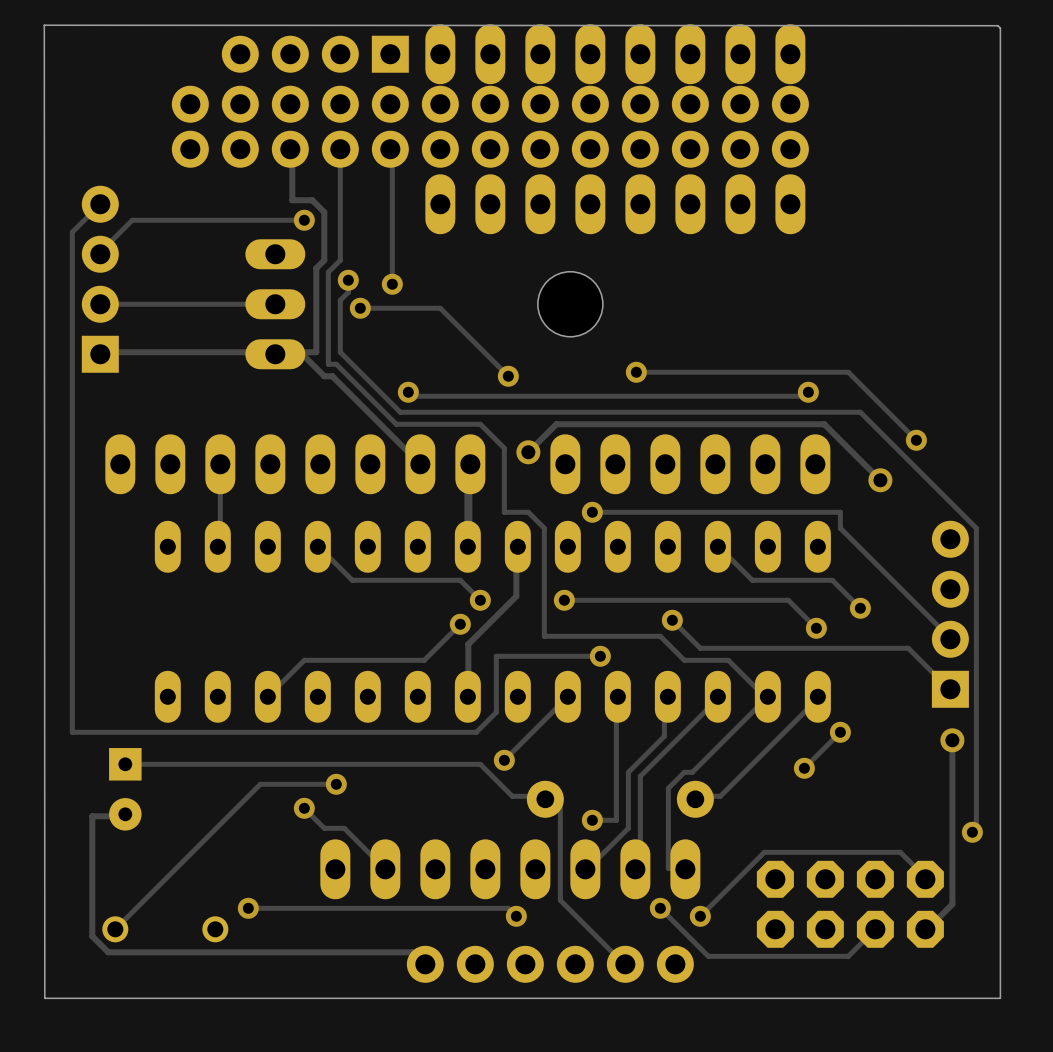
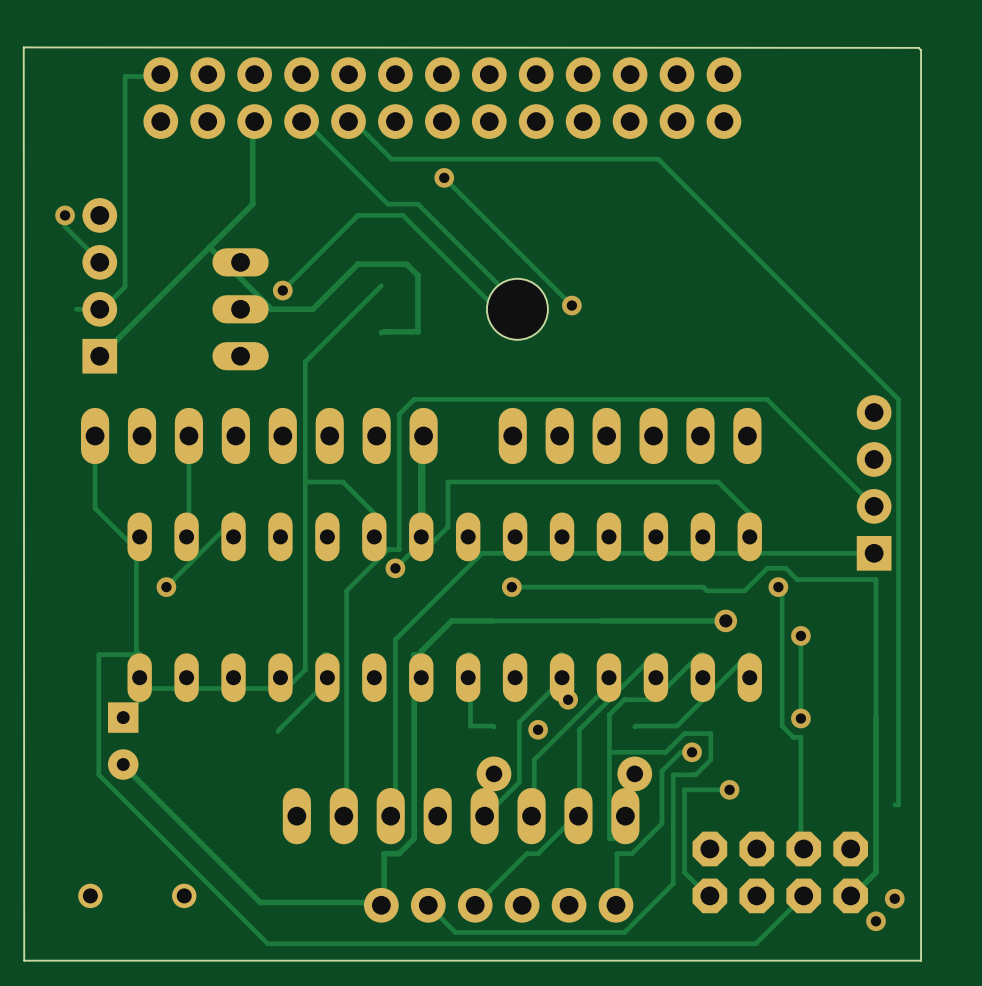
part: (315, 54) -> none
part: (615, 54) -> none
track: none -> (254, 116) (252, 117) (252, 204) (99, 356)
track: none -> (301, 116) (387, 204) (417, 204) (511, 298)
track: (290, 149) (292, 152) (292, 200) (312, 200) (324, 212) (324, 260) (316, 268) (316, 352) (276, 352) (275, 354) -> none
track: (340, 149) (340, 260) (328, 272) (328, 364) (336, 364) (396, 424) (480, 424) (504, 448) (504, 512) (528, 512) (544, 528) (544, 636) -> (123, 764) (260, 902) (380, 902) (381, 905) (384, 902) (384, 853) (399, 853) (414, 838) (414, 654) (421, 654) (421, 650) (451, 620) (493, 620)
track: (390, 149) (392, 152) (392, 284) -> none
part position: (490, 149) -> (442, 74)
track: none -> (444, 177) (571, 305)
via: none -> (444, 177)
track: none -> (65, 215) (65, 226) (99, 262)
via: none -> (65, 215)
track: (100, 204) (72, 232) (72, 732) (476, 732) (496, 712) (496, 656) (600, 656) -> none
part: (615, 204) -> none
track: (304, 220) (132, 220) (100, 254) -> none
via: (304, 220) -> none
track: none -> (209, 247) (271, 309) (312, 309) (357, 264) (406, 264) (417, 275) (417, 331) (381, 332)
part position: (100, 279) -> (99, 285)
track: none -> (381, 285) (305, 361) (305, 669) (286, 688) (151, 688) (123, 717)
track: (348, 280) (348, 292) (340, 300) (340, 352) (400, 412) (860, 412) (976, 528) -> (348, 116) (391, 159) (658, 159) (898, 399) (898, 519)
via: (348, 280) -> none
track: none -> (282, 290) (357, 215) (402, 215) (504, 316) (534, 316) (541, 324)
via: none -> (282, 290)
via: (392, 284) -> none
via: none -> (571, 305)
track: (275, 304) (128, 304) -> (160, 74) (158, 76) (125, 76) (125, 286) (102, 309)
track: (360, 308) (440, 308) (508, 376) -> none
via: (360, 308) -> none
track: (275, 354) (272, 352) (100, 352) (100, 354) -> none
track: (275, 354) (300, 352) (324, 376) (332, 376) (420, 464) -> none
track: (636, 372) (848, 372) (916, 440) -> none
via: (636, 372) -> none
via: (508, 376) -> none
via: (408, 392) -> none
track: (808, 392) (804, 396) (412, 396) (408, 392) -> none
via: (808, 392) -> none
via: (916, 440) -> none
track: (528, 452) (556, 424) (824, 424) (880, 480) -> none
via: (528, 452) -> none
part position: (295, 464) -> (259, 436)
part position: (690, 464) -> (630, 436)
via: (880, 480) -> none
track: none -> (305, 481) (342, 481) (374, 513)
track: (592, 512) (840, 512) (840, 528) (950, 639) -> none
via: (592, 512) -> none
track: none -> (874, 506) (767, 399) (414, 399) (399, 414) (399, 549) (387, 549) (346, 590) (346, 816) (343, 816)
track: none -> (233, 513) (230, 515) (230, 523) (166, 587)
track: none -> (749, 513) (718, 481) (447, 481) (447, 527) (429, 545) (417, 545) (395, 568)
track: (317, 546) (352, 580) (460, 580) (480, 600) -> none
track: (517, 546) (516, 596) (468, 644) (467, 696) -> none
track: (717, 546) (752, 580) (832, 580) (860, 608) -> none
track: none -> (874, 553) (481, 553) (395, 639) (395, 816) (390, 816)
via: none -> (395, 568)
via: none -> (166, 587)
via: (480, 600) -> none
track: (768, 600) (788, 600) (816, 628) -> (703, 587) (707, 590) (744, 590) (767, 568) (785, 568) (797, 579) (875, 579) (875, 718)
track: none -> (778, 587) (782, 587) (782, 726) (793, 737) (800, 737) (800, 846) (803, 848)
via position: (860, 608) -> (778, 587)
part position: (950, 614) -> (874, 482)
track: (672, 620) (700, 648) (908, 648) (950, 689) -> none
via: (672, 620) -> none
track: (460, 624) (424, 660) (304, 660) (267, 696) -> none
via: (460, 624) -> none
via: (816, 628) -> none
track: (660, 636) (684, 660) (728, 660) (764, 696) (767, 696) (692, 772) (684, 772) (668, 788) -> (702, 654) (699, 654) (654, 699) (624, 699) (609, 714) (609, 763)
track: none -> (725, 620) (601, 620)
via: none -> (725, 620)
track: none -> (800, 635) (800, 718)
via: none -> (800, 635)
via: (600, 656) -> none
track: none -> (327, 654) (324, 654) (324, 684) (278, 731)
track: none -> (468, 654) (470, 654) (470, 726) (493, 726)
track: none -> (562, 654) (560, 680) (519, 722) (519, 782) (484, 816)
track: none -> (655, 654) (579, 729) (579, 816) (575, 816) (538, 853) (526, 853) (475, 905)
track: none -> (749, 654) (677, 726) (634, 726)
track: (567, 696) (504, 760) -> none
track: (617, 696) (616, 820) (592, 820) -> none
track: (717, 696) (640, 776) (640, 868) (635, 869) -> none
track: (817, 696) (720, 796) (696, 796) (695, 799) -> none
track: (664, 708) (664, 736) (628, 772) (628, 828) (585, 869) -> (605, 688) (534, 759) (534, 816) (531, 816)
via: none -> (568, 699)
track: (840, 732) (804, 768) -> none
via position: (840, 732) -> (800, 718)
via: (952, 740) -> none
via: none -> (538, 729)
via: (504, 760) -> none
track: (125, 764) (480, 764) (512, 796) (544, 796) (548, 800) (560, 800) (560, 900) (625, 964) -> none
via: (804, 768) -> none
track: none -> (609, 752) (665, 752) (684, 733) (710, 733) (710, 759) (695, 774) (673, 774) (673, 883) (624, 932) (455, 932) (428, 905)
track: none -> (692, 752) (680, 752) (661, 771) (661, 823) (631, 853) (616, 853) (616, 905)
via: none -> (692, 752)
track: (336, 784) (260, 784) (115, 929) -> none
via: (336, 784) -> none
part position: (125, 789) -> (123, 741)
track: (304, 808) (324, 828) (344, 828) (385, 869) -> none
via: (304, 808) -> none
track: (125, 814) (124, 816) (92, 816) (92, 936) (108, 952) (412, 952) (425, 964) -> none
track: none -> (729, 789) (684, 789) (684, 872) (709, 895)
via: none -> (729, 789)
via: (592, 820) -> none
via: (972, 832) -> none
part position: (510, 869) -> (461, 816)
track: (925, 879) (900, 852) (764, 852) (700, 916) -> none
track: (248, 908) (508, 908) (516, 916) -> none
via: (248, 908) -> none
track: (660, 908) (708, 956) (848, 956) -> (95, 436) (95, 508) (132, 545) (136, 545) (136, 650) (139, 654) (98, 654) (98, 774) (267, 943) (755, 943) (778, 921)
via: (660, 908) -> none
via: (516, 916) -> none
via: (700, 916) -> none
via: none -> (894, 898)
via: none -> (875, 921)
part position: (550, 964) -> (498, 905)

